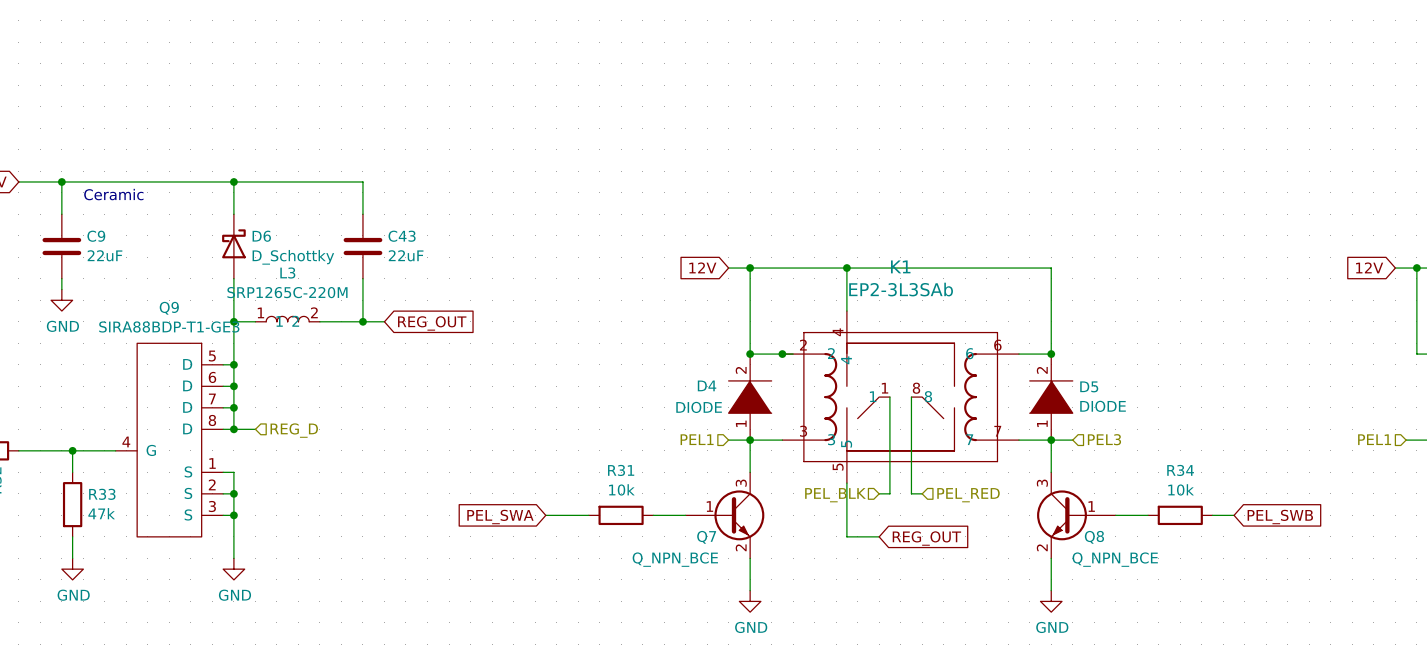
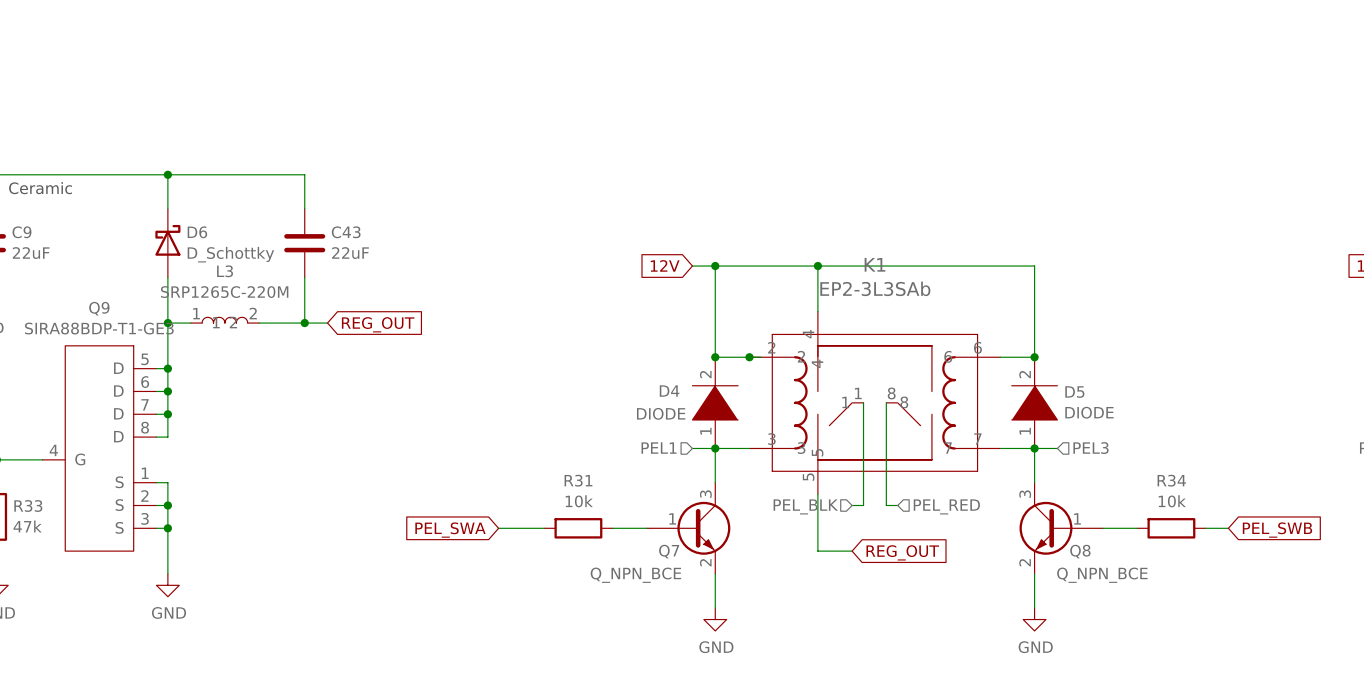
wire: (233, 429) (255, 429) -> none
junction: (233, 429) -> none
hierarchical label: REG_D (294, 430) -> none

